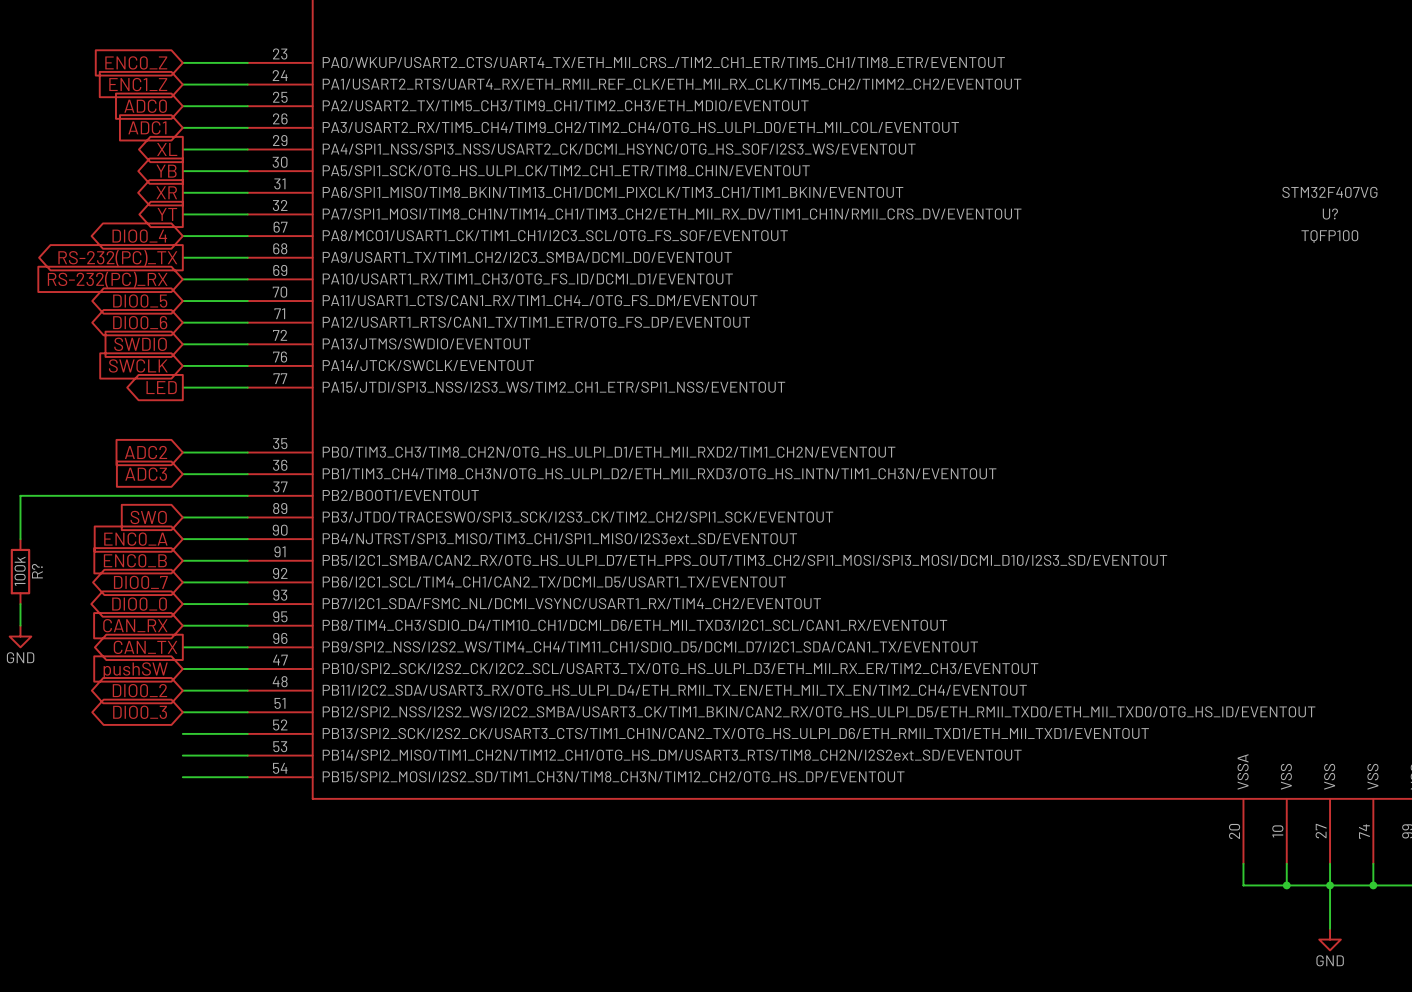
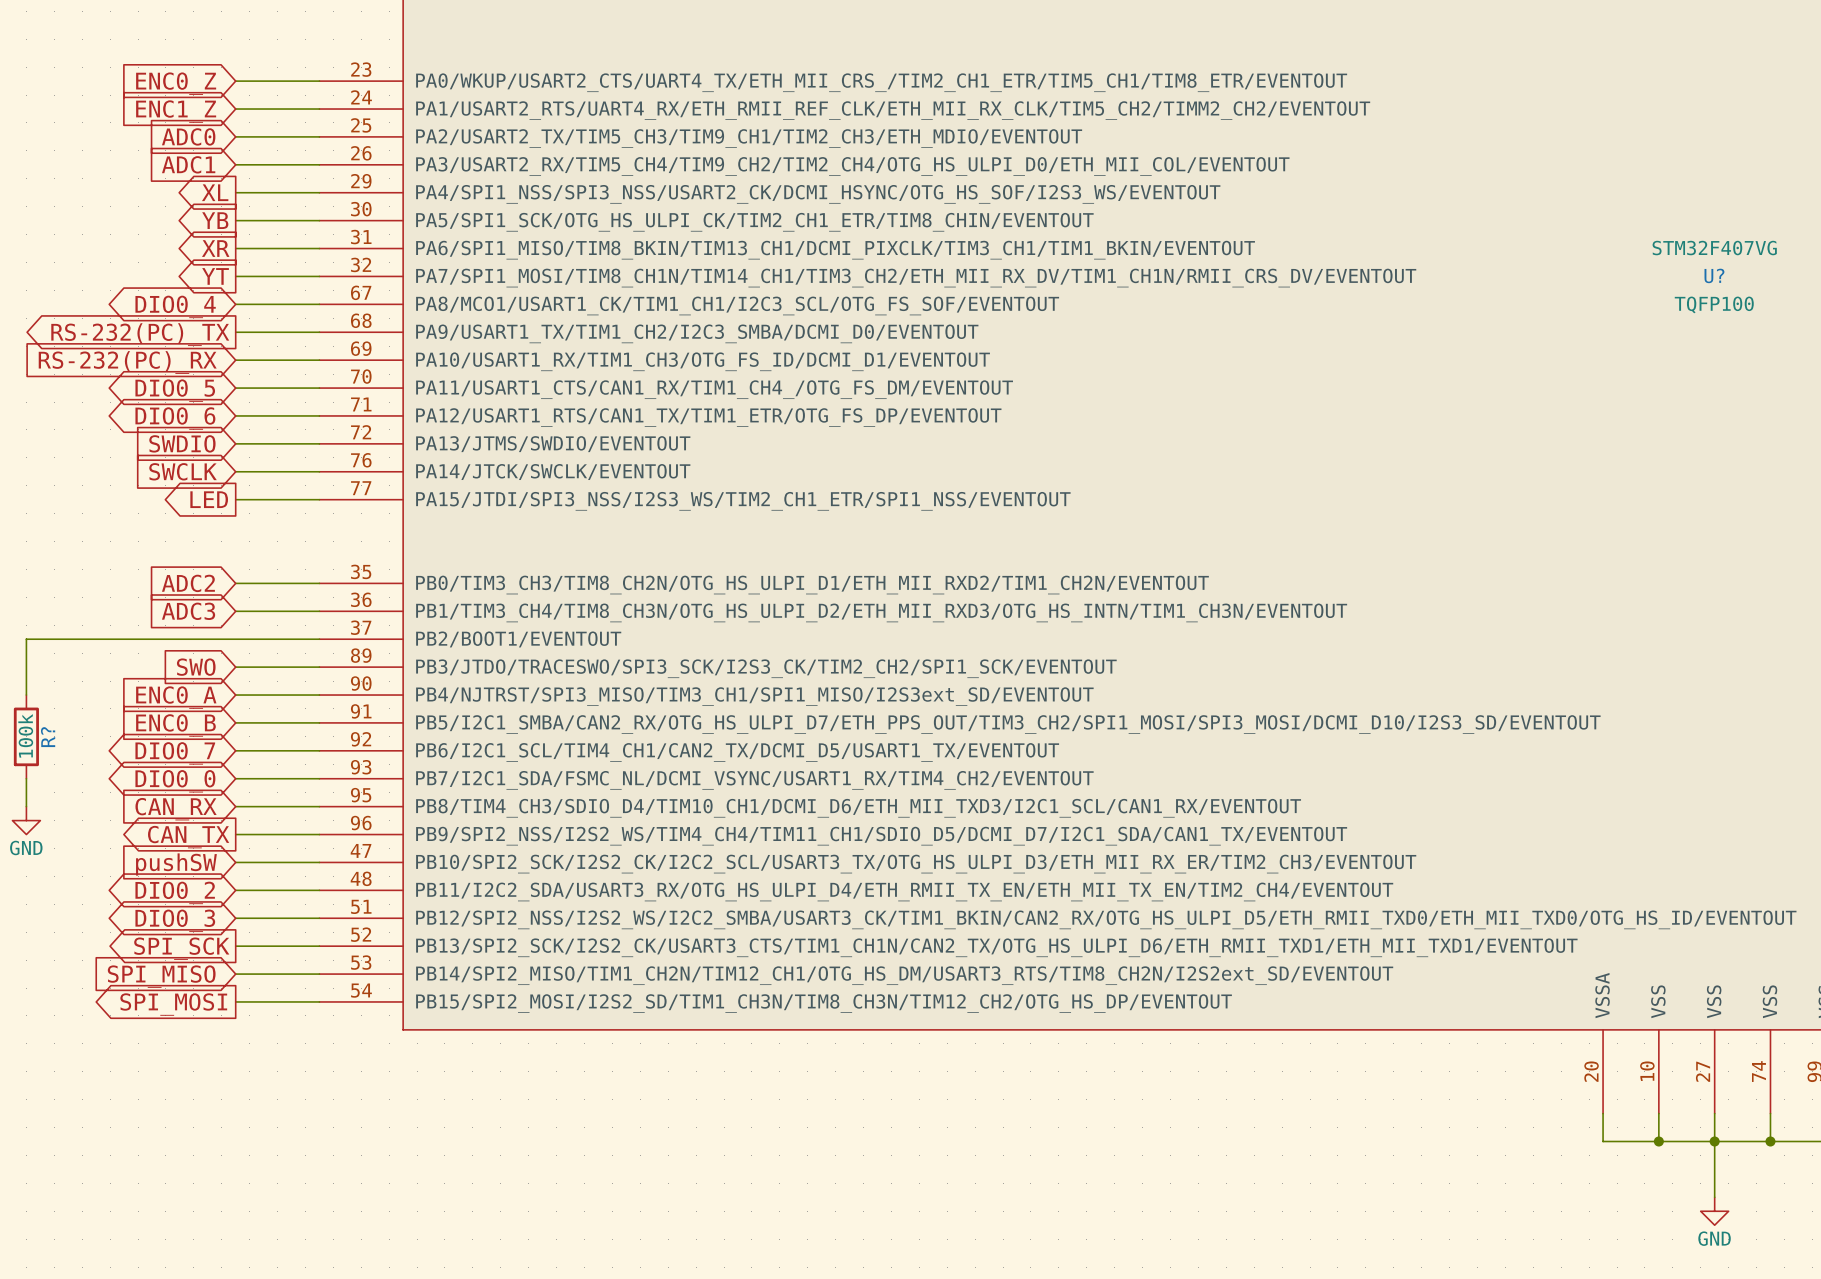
global label: none -> SPI_SCK (181, 948)
global label: none -> SPI_MISO (161, 976)
global label: none -> SPI_MOSI (173, 1004)

